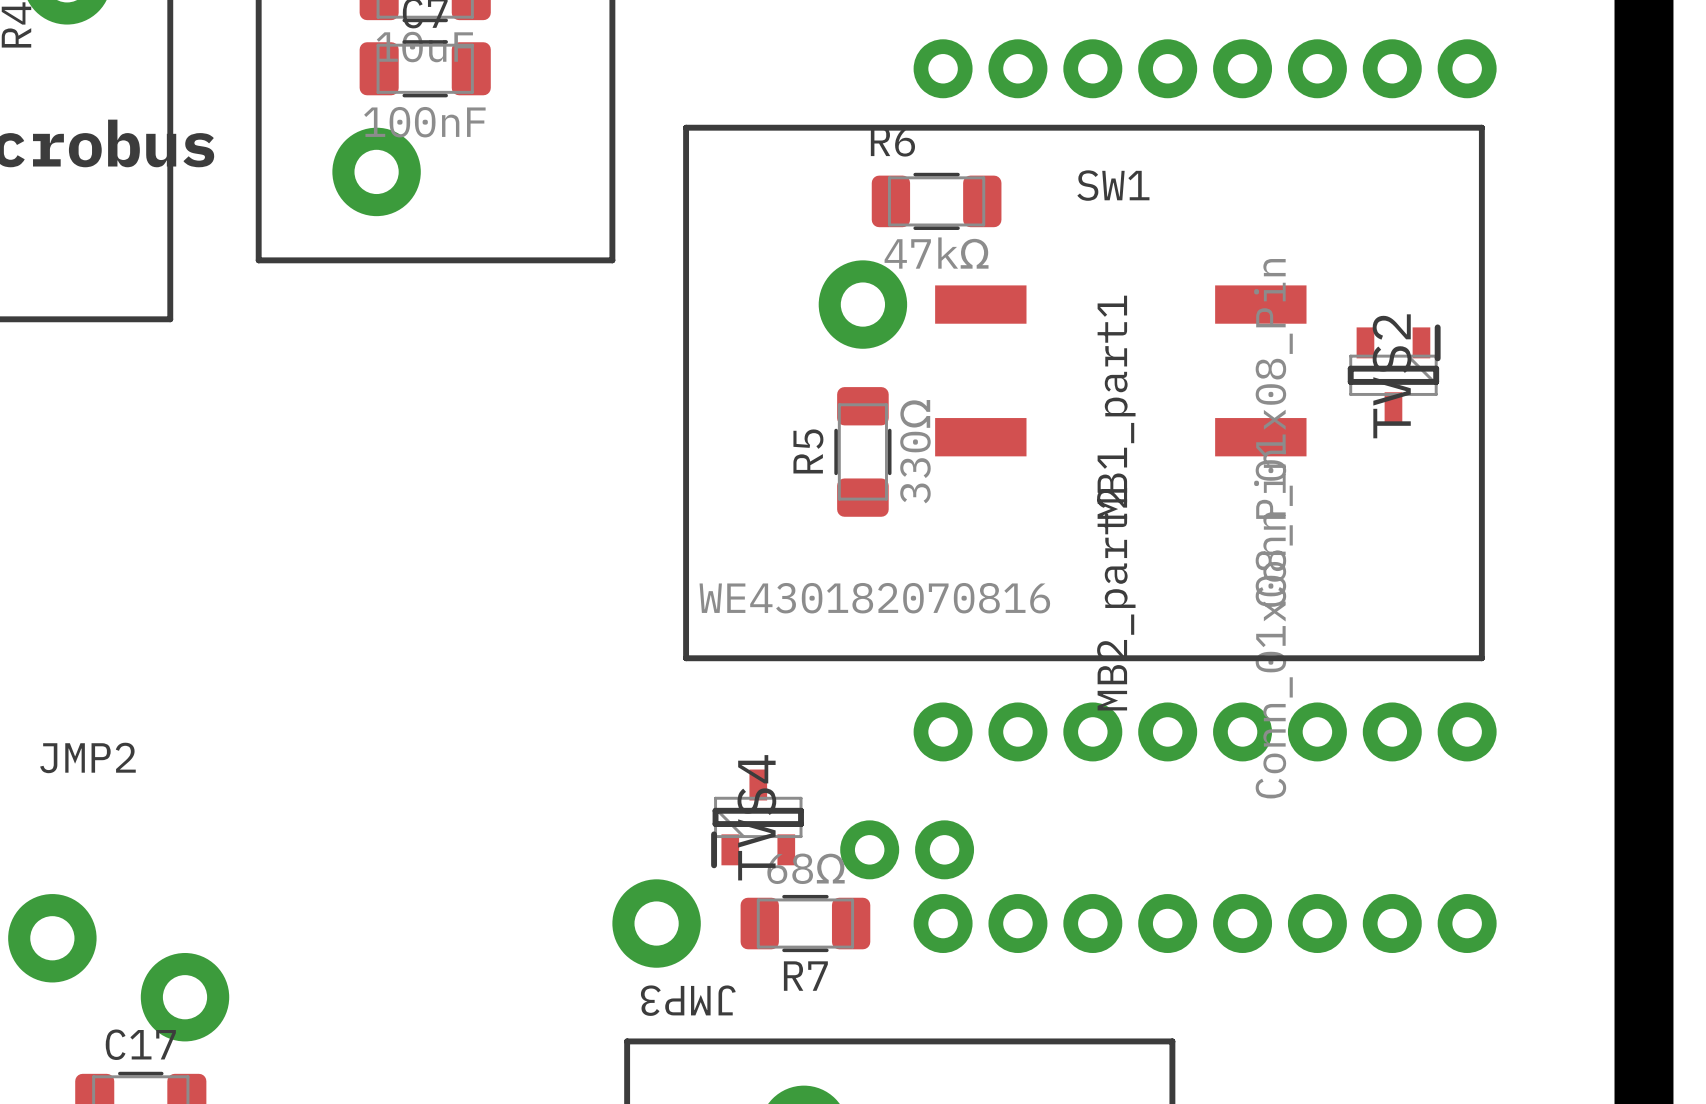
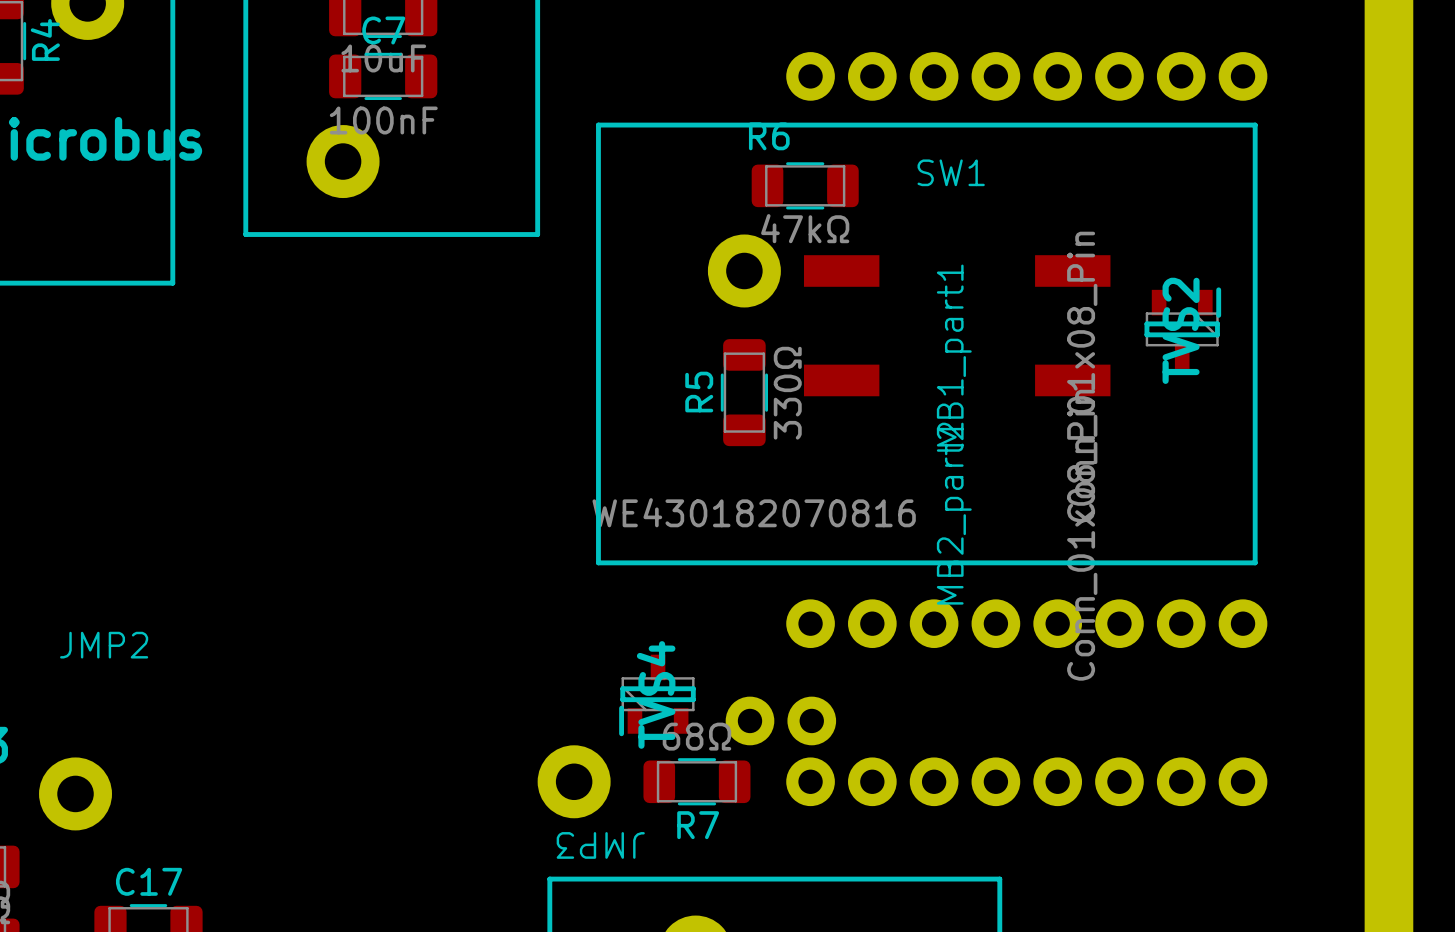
part: (185, 997) -> none

